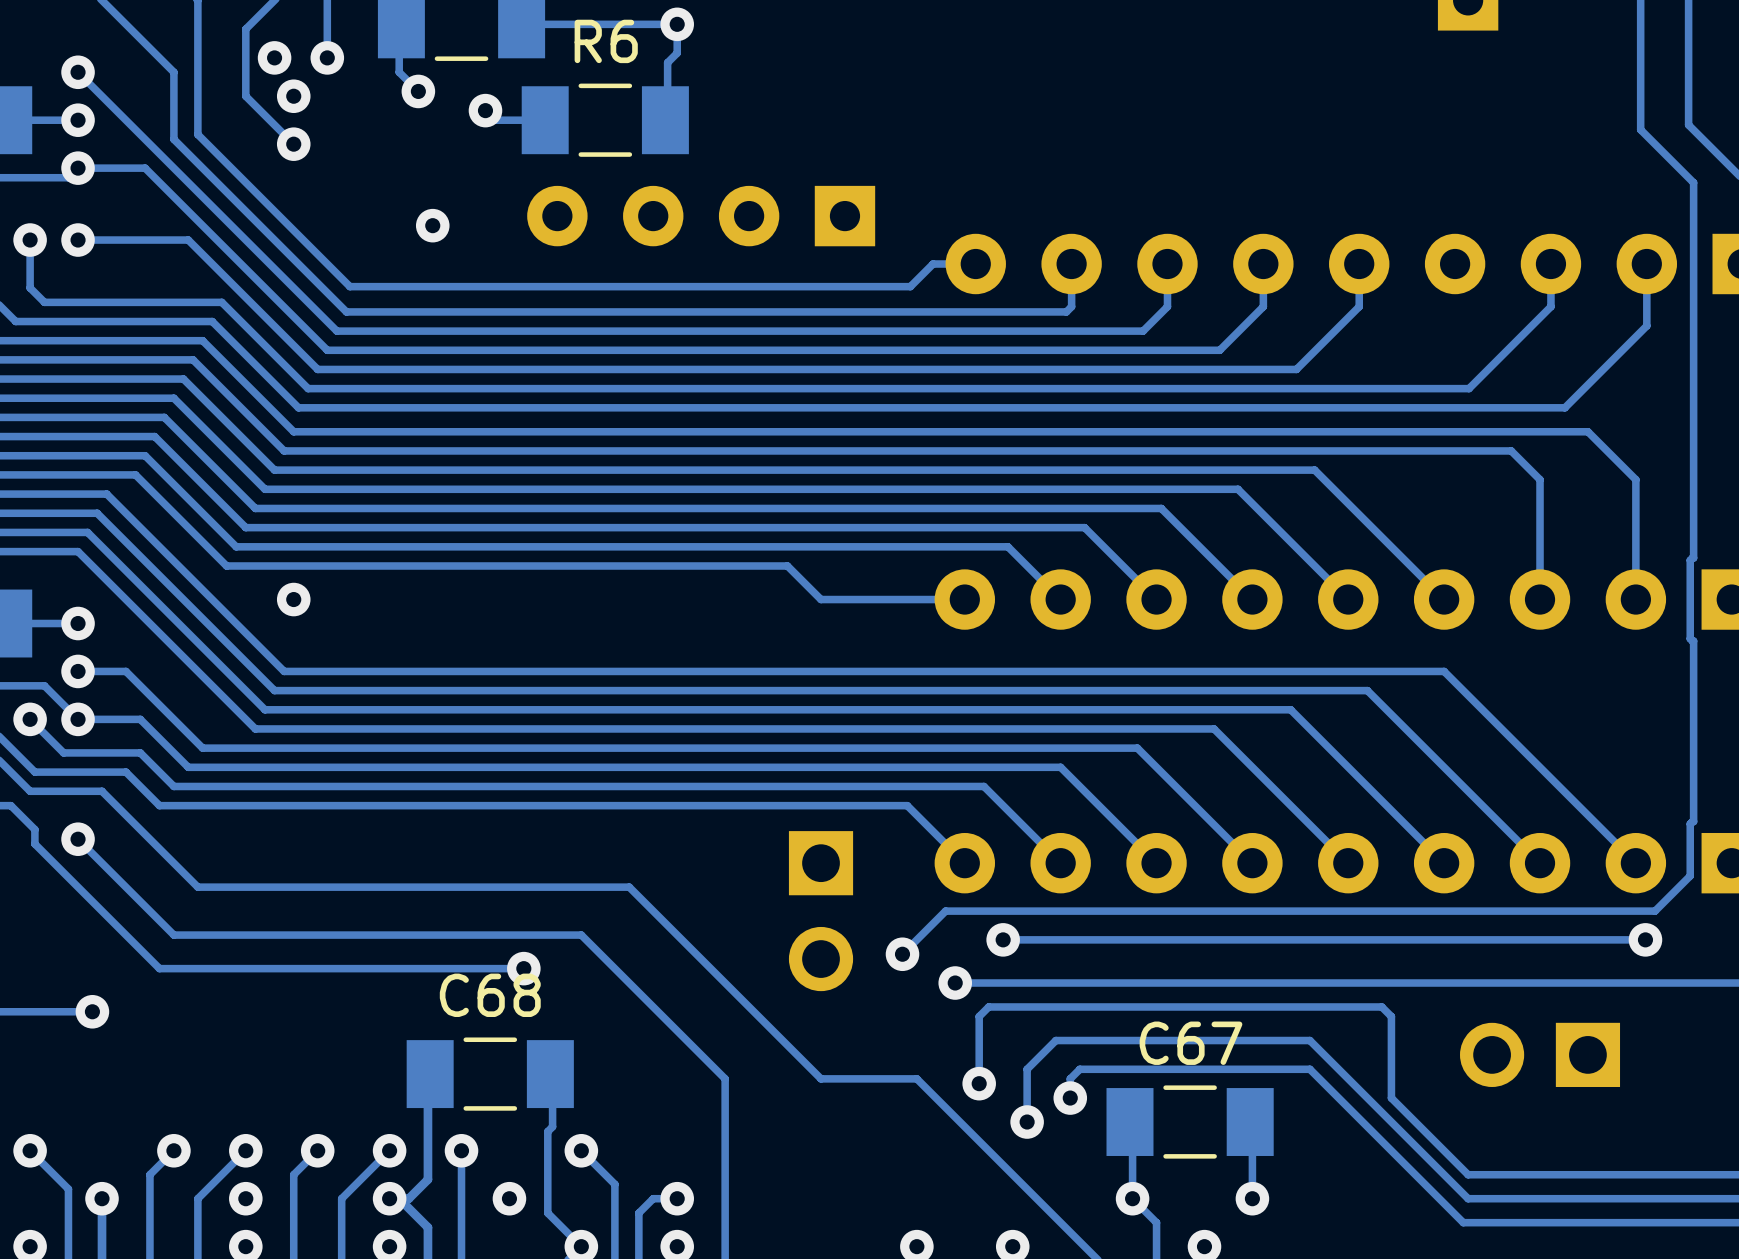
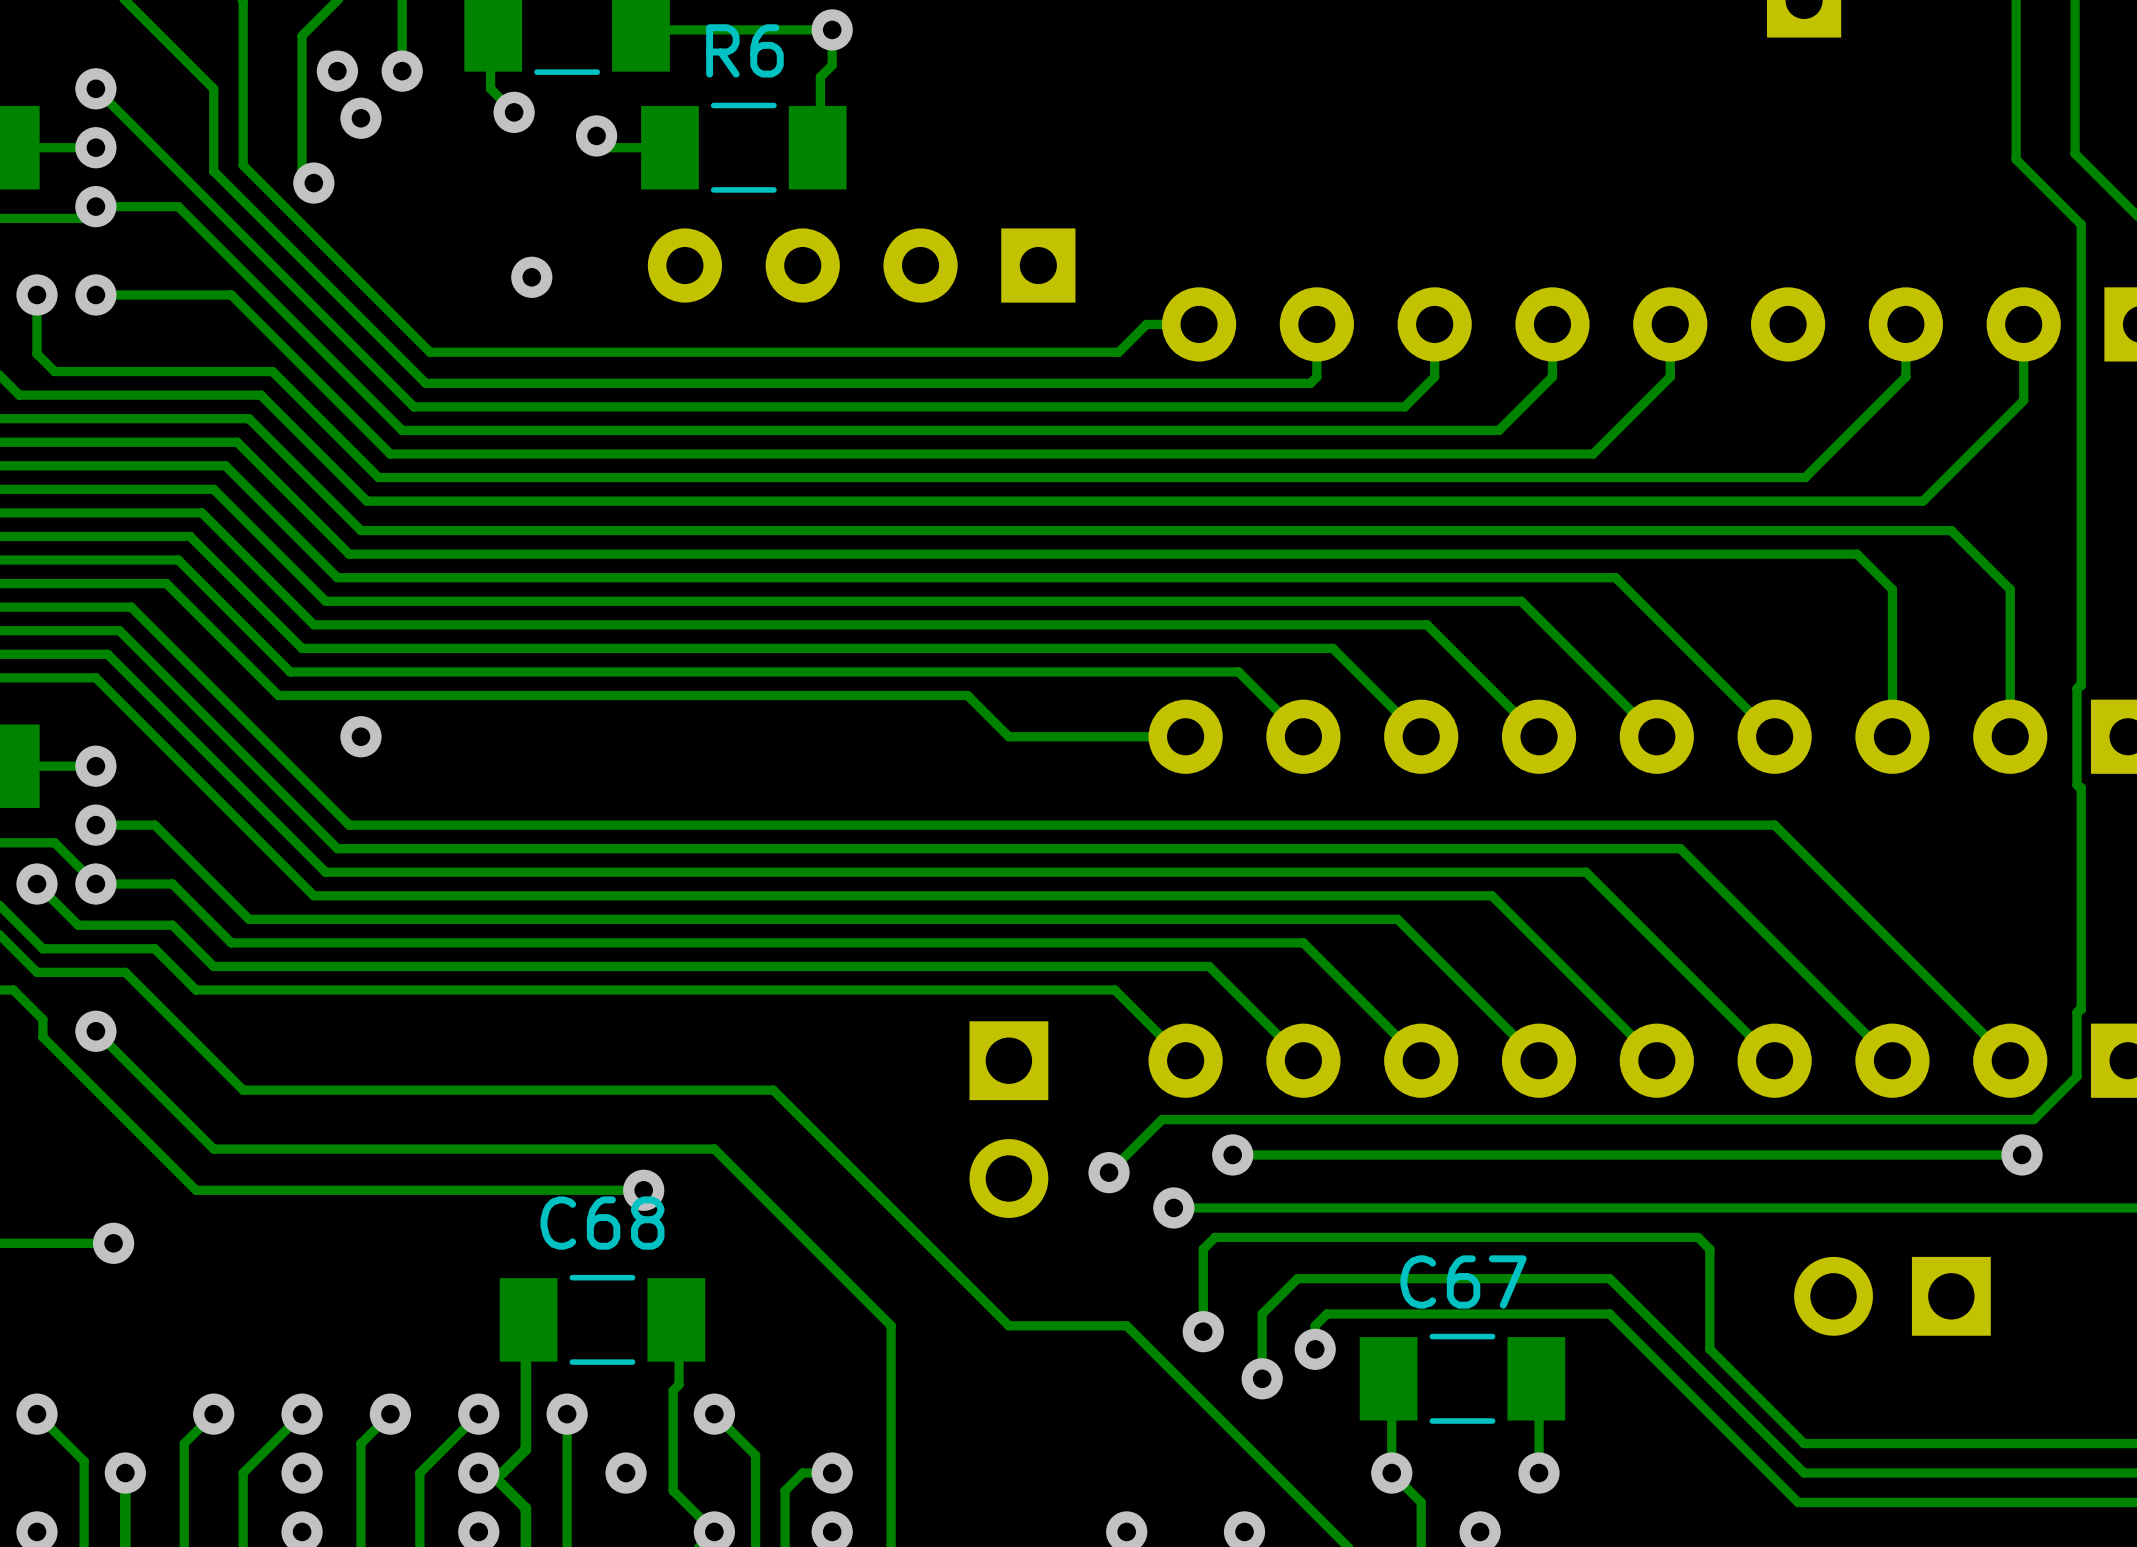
track: (245, 96) (293, 144) -> (302, 118) (302, 171) (313, 183)
via position: (293, 144) -> (313, 183)

